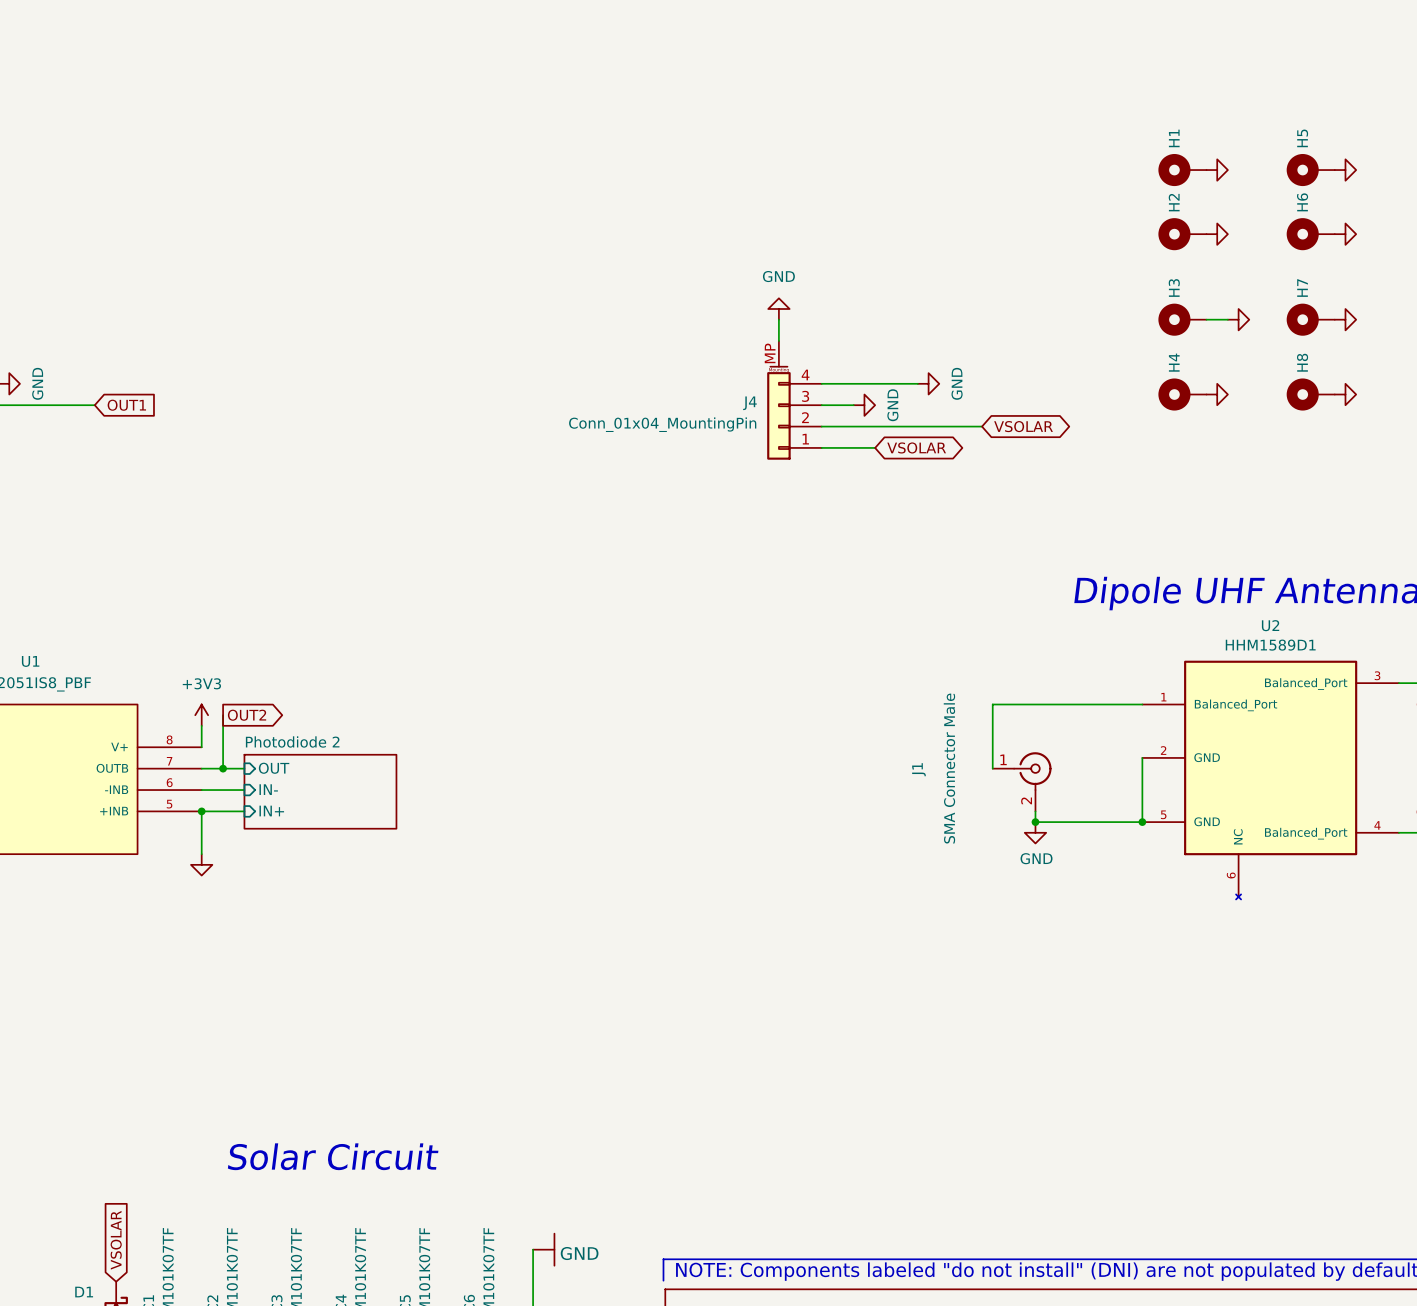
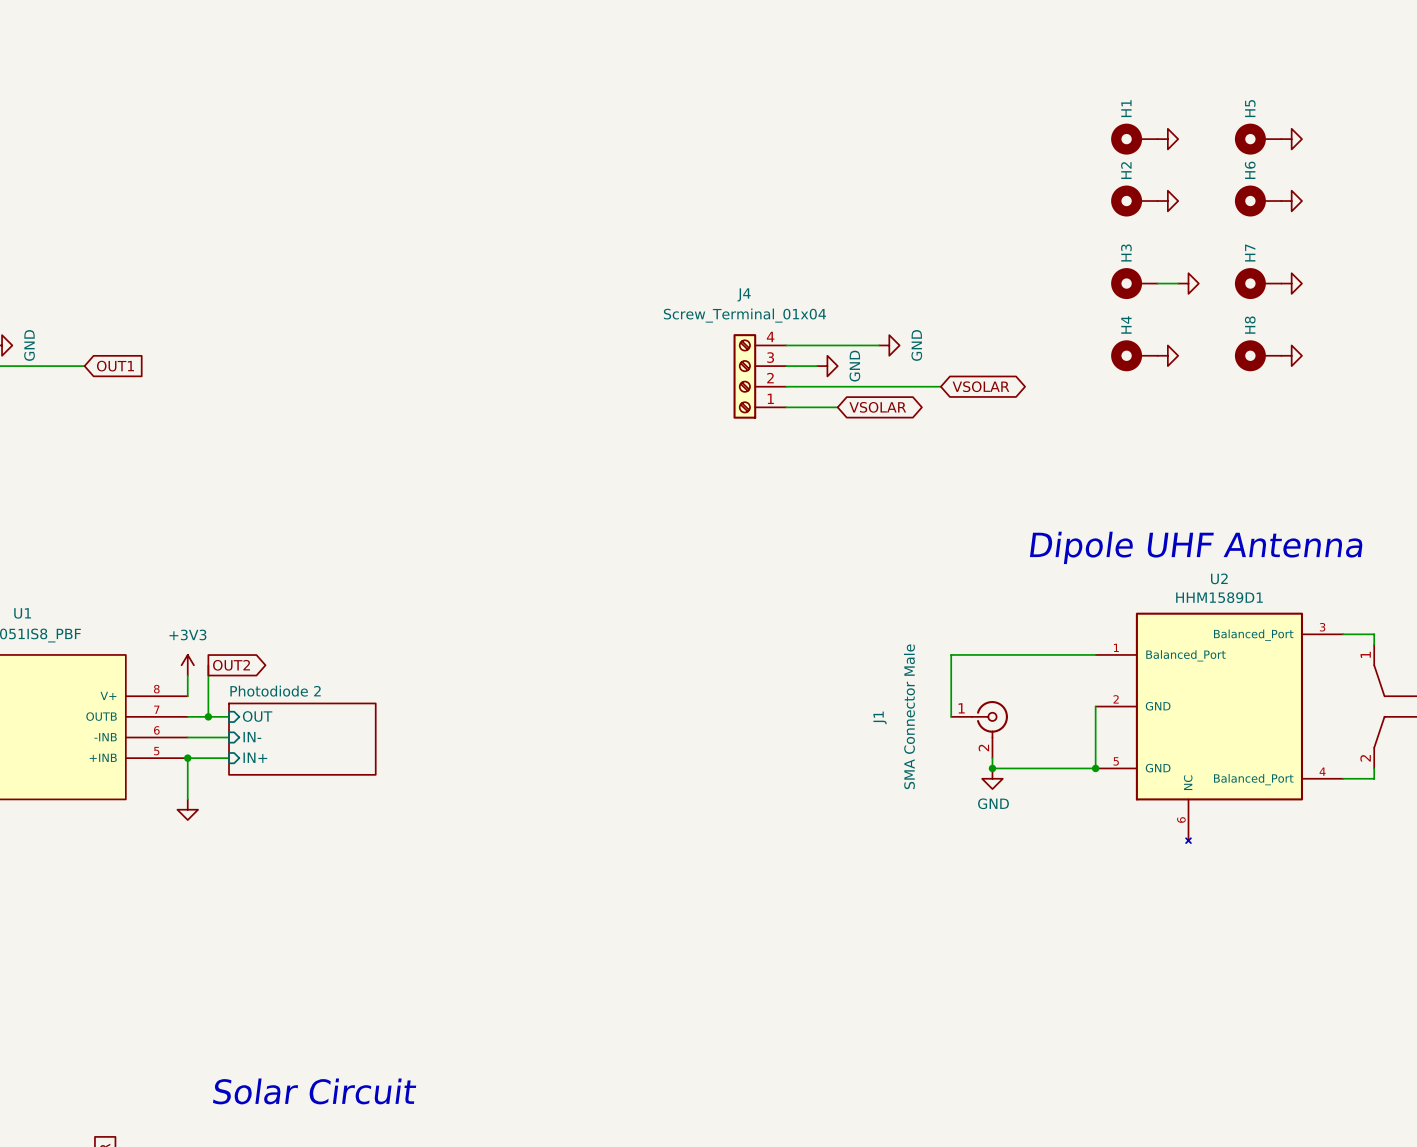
power symbol: GND (778, 308) -> none
wire: (778, 319) (778, 341) -> none
J4 symbol: [767, 341, 822, 460] -> [733, 334, 787, 419]
J4 name position: J4 (749, 403) -> J4 (744, 294)
J4 value: Conn_01x04_MountingPin (662, 424) -> Screw_Terminal_01x04 (744, 315)

